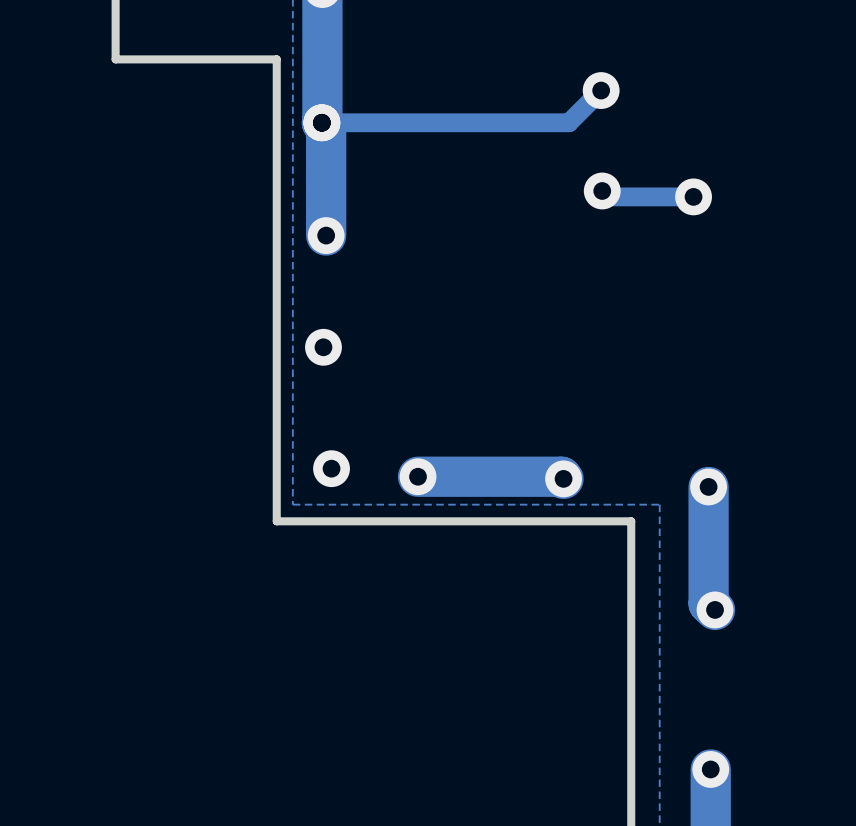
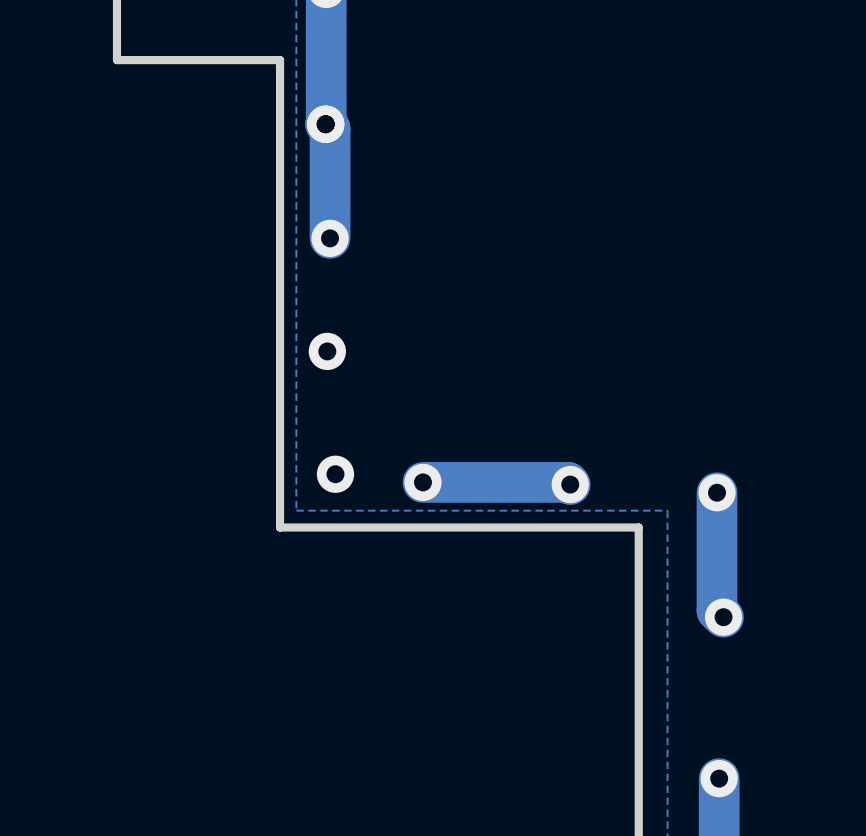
track: (601, 90) (568, 122) (321, 122) -> none
via: (601, 90) -> none
track: (602, 190) (608, 196) (693, 196) -> none
via: (602, 190) -> none
via: (693, 196) -> none

